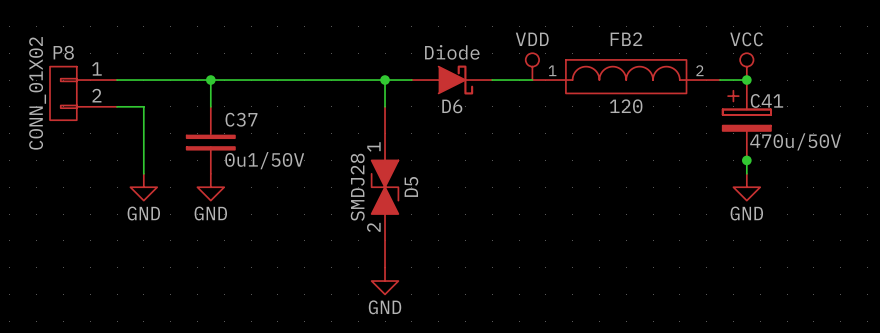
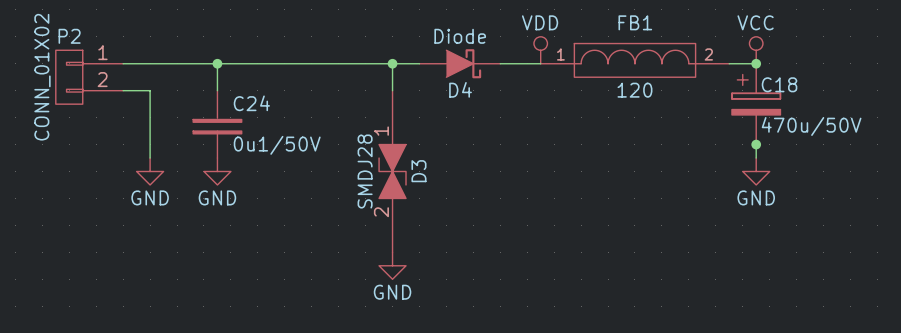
FB2 name: FB2 (626, 39) -> FB1 (635, 22)
P8 name: P8 (63, 52) -> P2 (69, 36)
C41 name: C41 (767, 100) -> C18 (779, 84)
D6 name: D6 (452, 106) -> D4 (460, 89)
C37 name: C37 (241, 119) -> C24 (251, 103)
D5 name: D5 (411, 186) -> D3 (418, 171)

